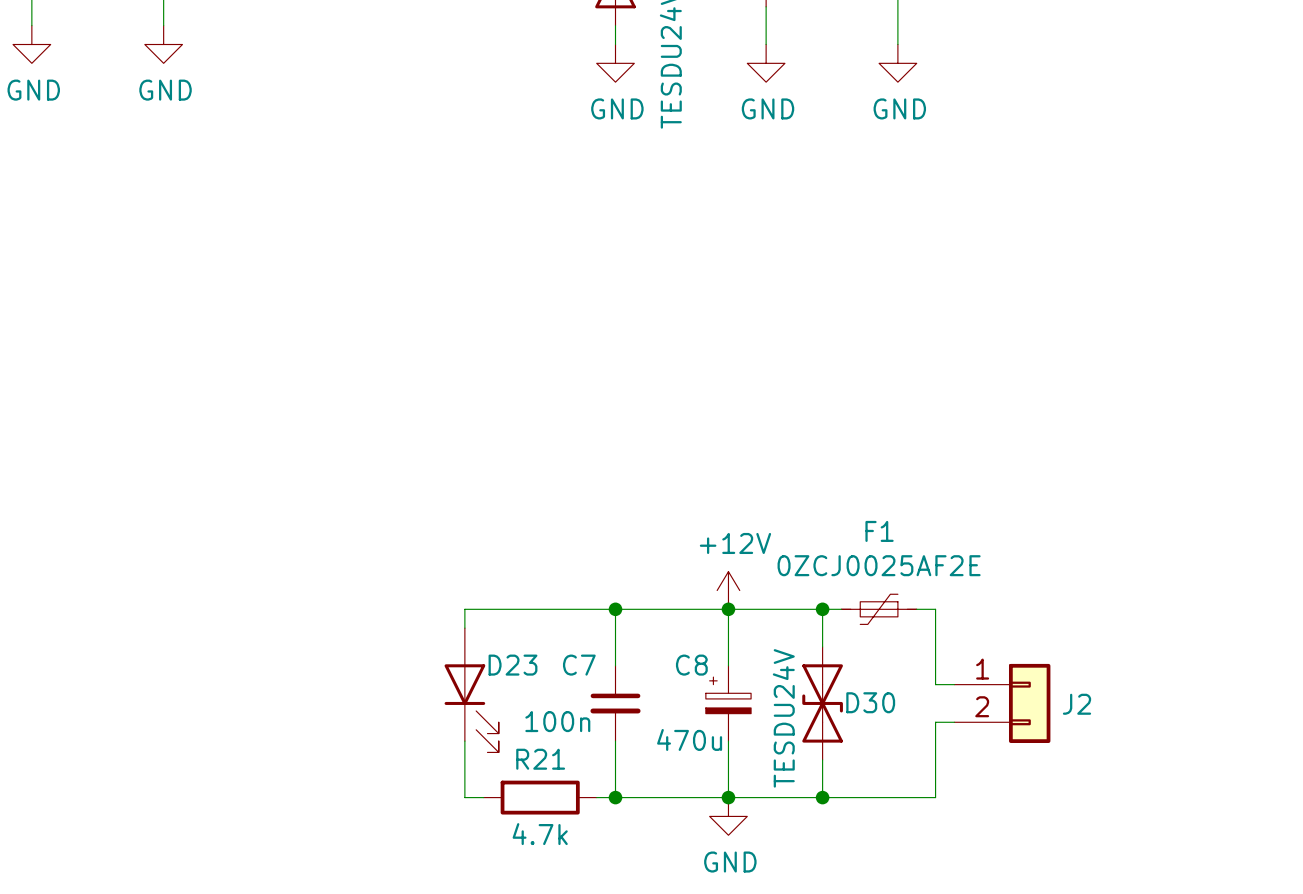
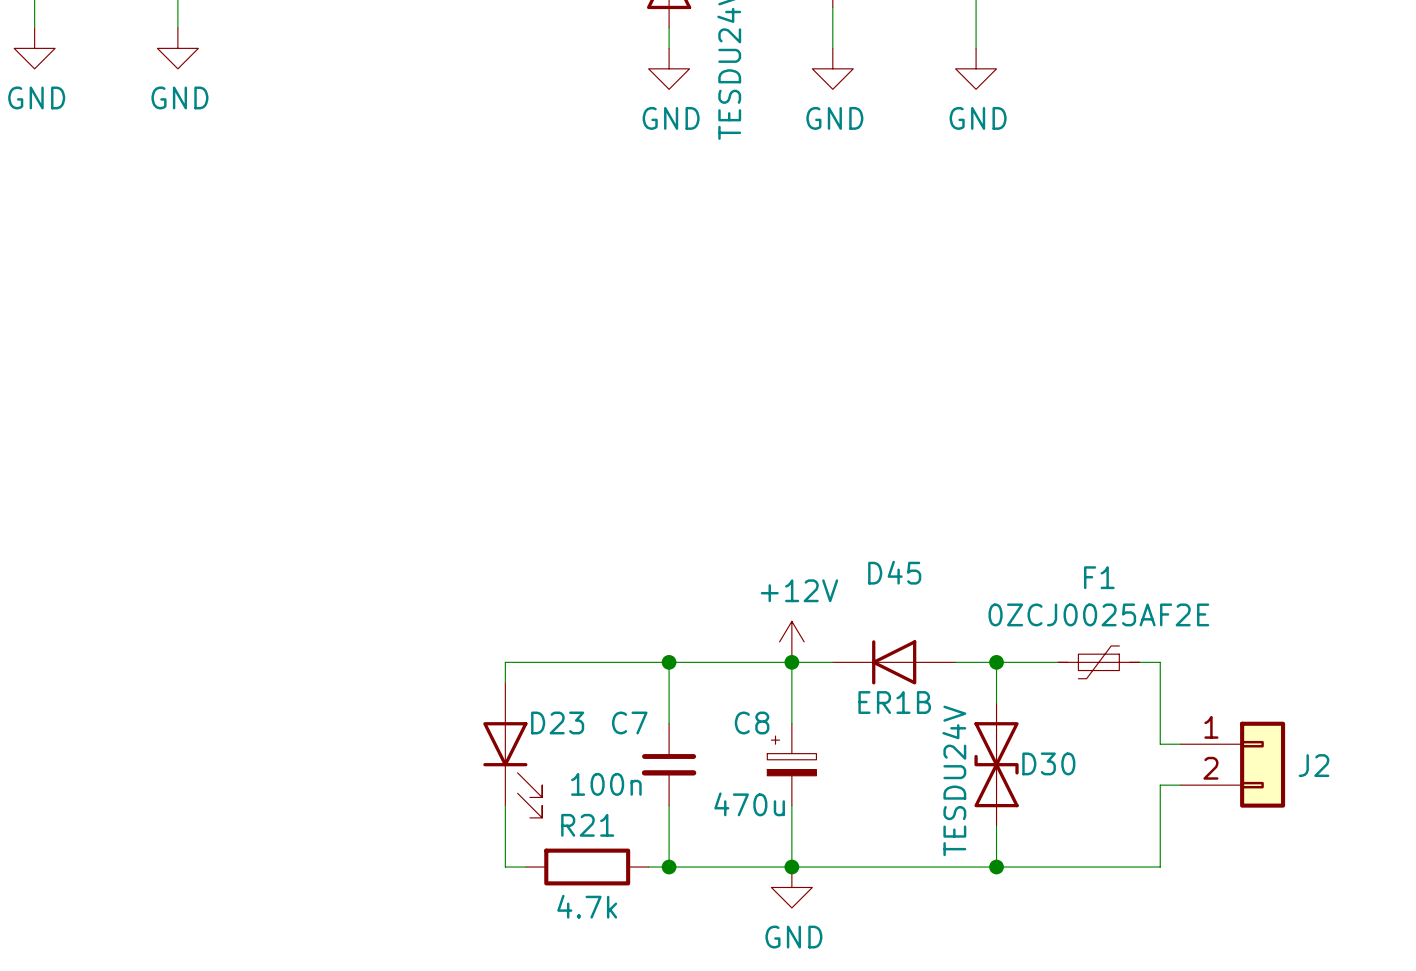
wire: (822, 609) (822, 646) -> none
D45: none -> ER1B (894, 662)
junction: (822, 609) -> none
wire: none -> (955, 662) (996, 662) (996, 703)
F1 position: (879, 609) -> (1098, 662)
junction: none -> (996, 662)
wire: (935, 609) (935, 684) (954, 684) -> (1017, 662) (1057, 662)
wire: none -> (1139, 662) (1160, 662) (1160, 744) (1180, 744)
D30 position: (822, 703) -> (996, 764)
J2 position: (1002, 703) -> (1232, 764)
wire: (954, 722) (935, 722) (935, 797) -> (1180, 785) (1160, 785) (1160, 867) (1017, 867)
wire: (822, 759) (822, 797) -> (996, 826) (996, 867)
junction: (822, 797) -> none
junction: none -> (996, 867)

